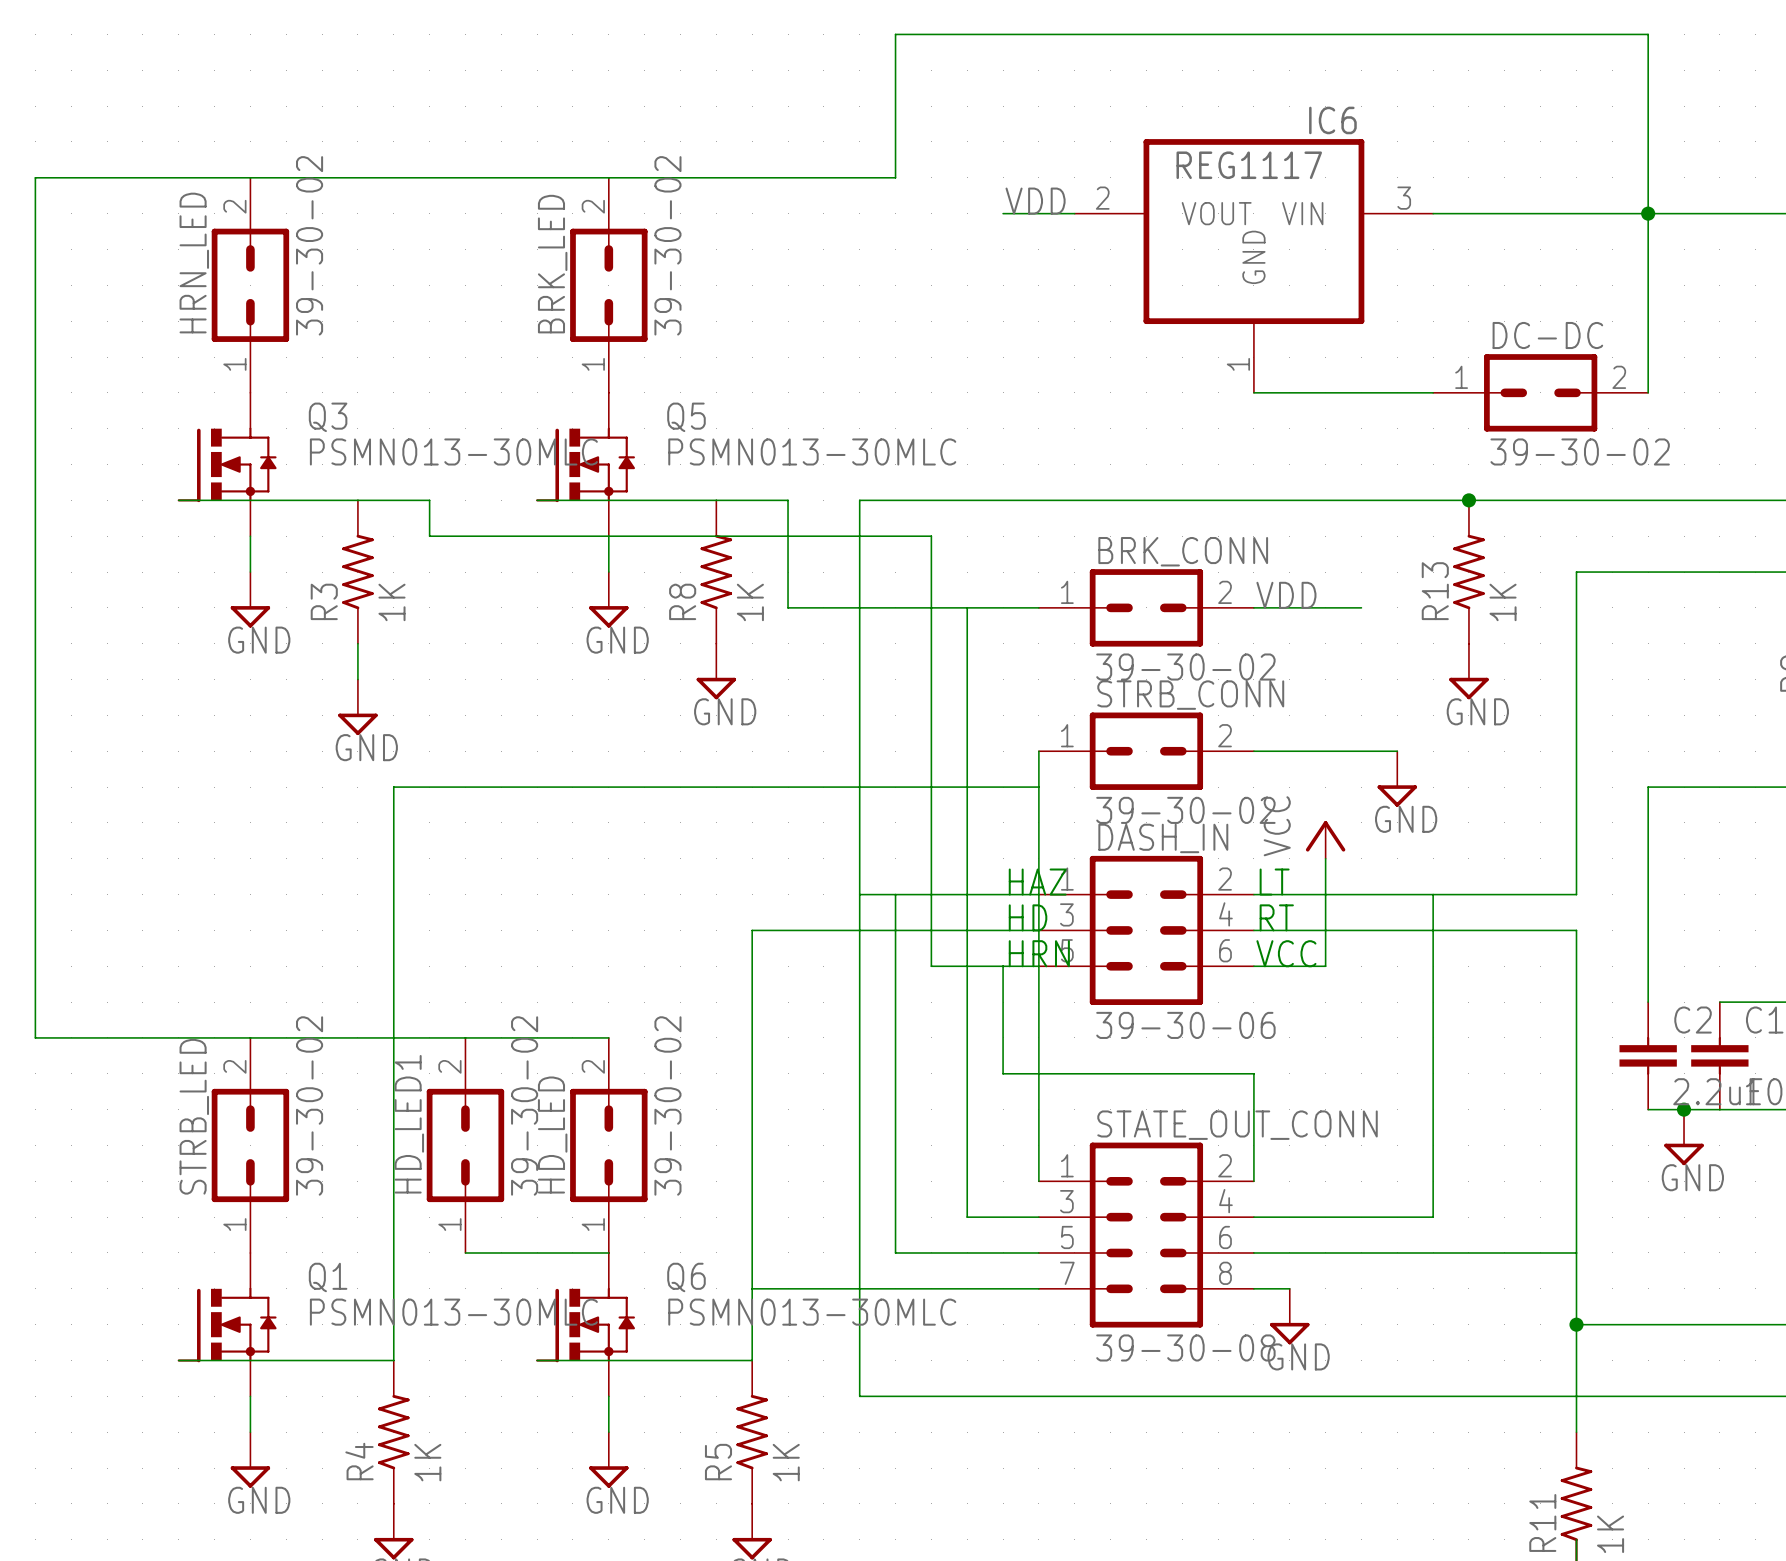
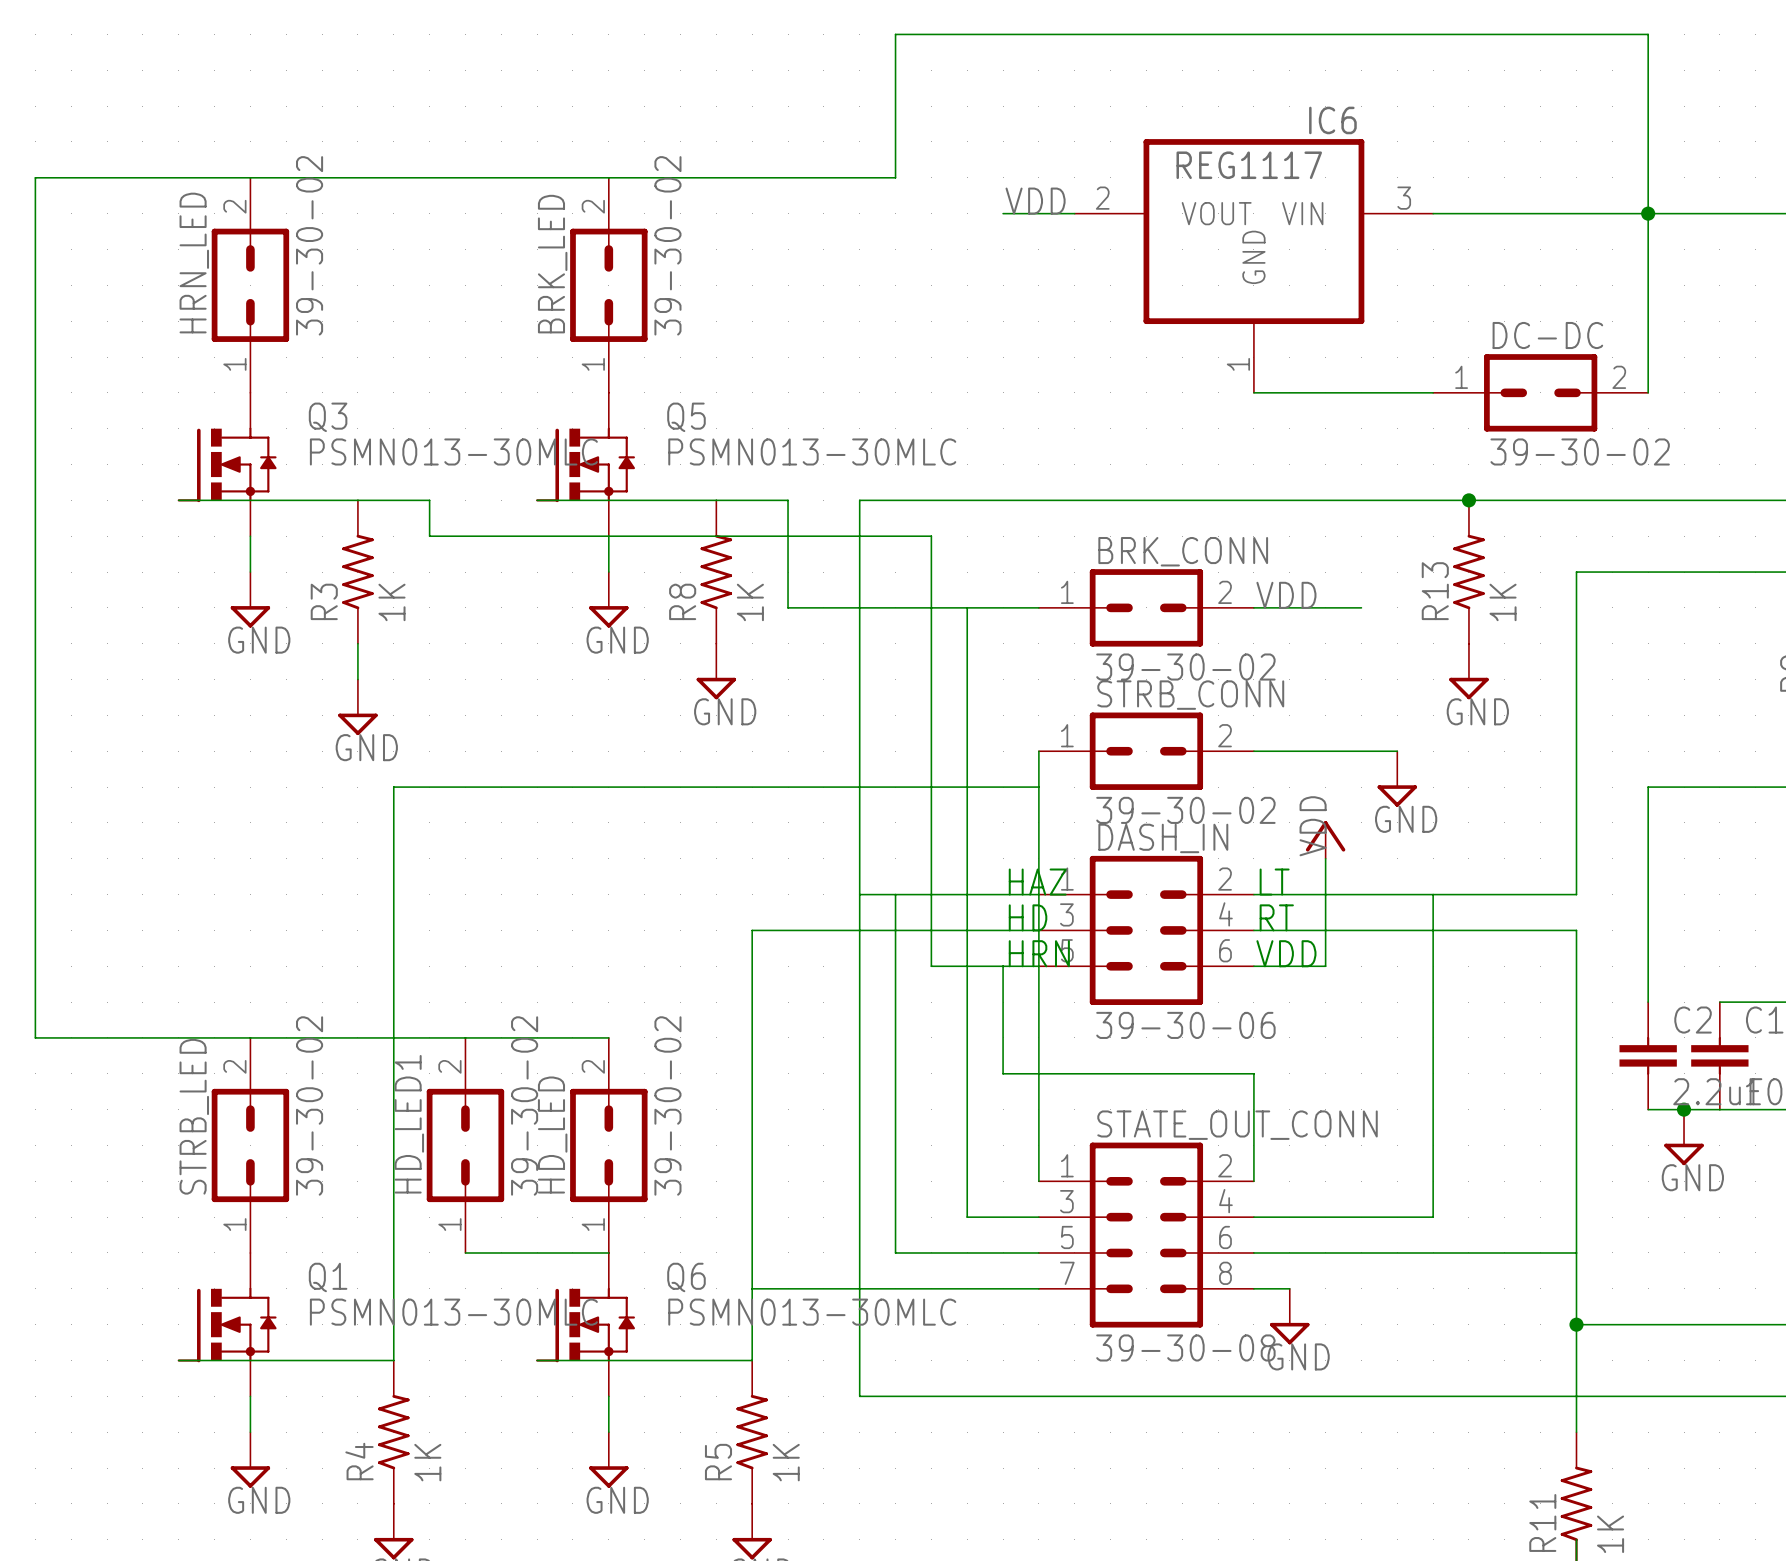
power symbol text: VCC (1277, 826) -> none
label: none -> VDD (1313, 826)
text: VCC (1286, 953) -> VDD (1286, 953)

